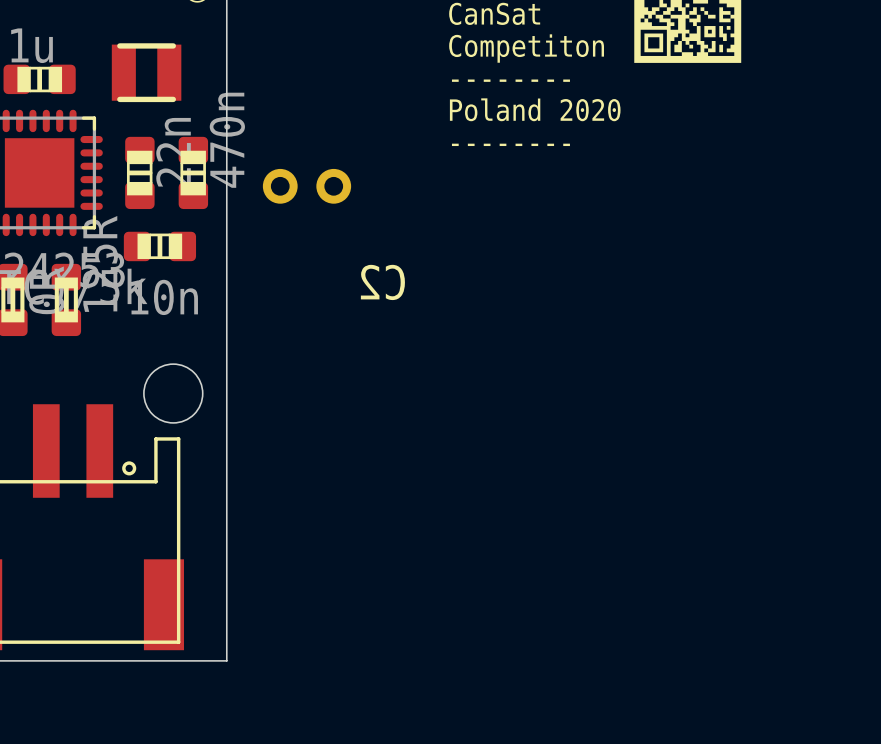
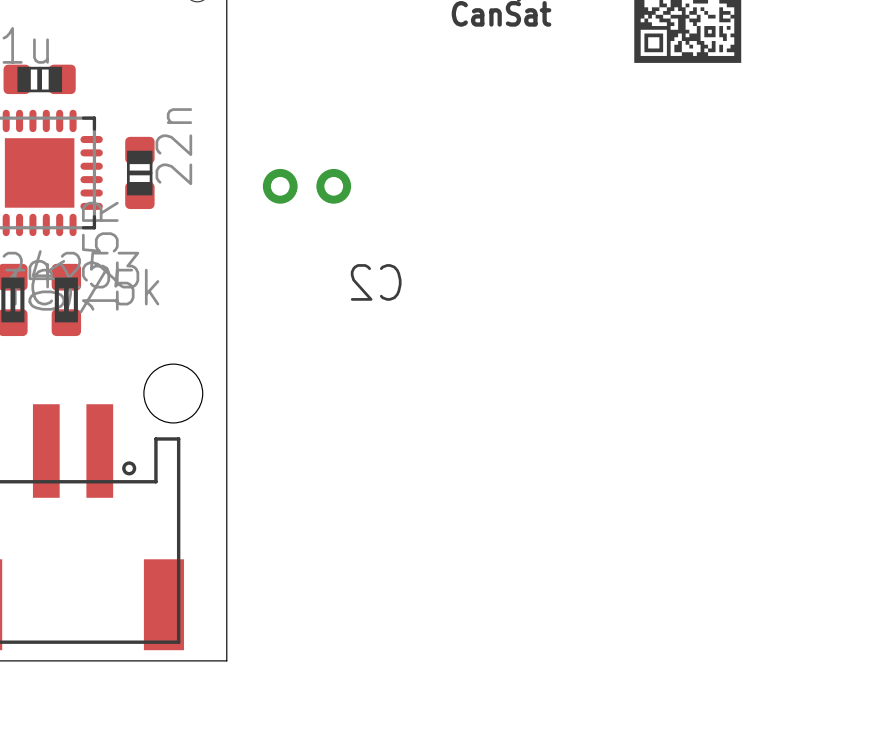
text: Competiton (526, 48) -> none
part: (146, 72) -> none
text: -------- (510, 80) -> none
text: Poland 2020 (535, 109) -> none
text: -------- (510, 144) -> none
part: 470n (193, 172) -> none
part: 10n (159, 246) -> none

